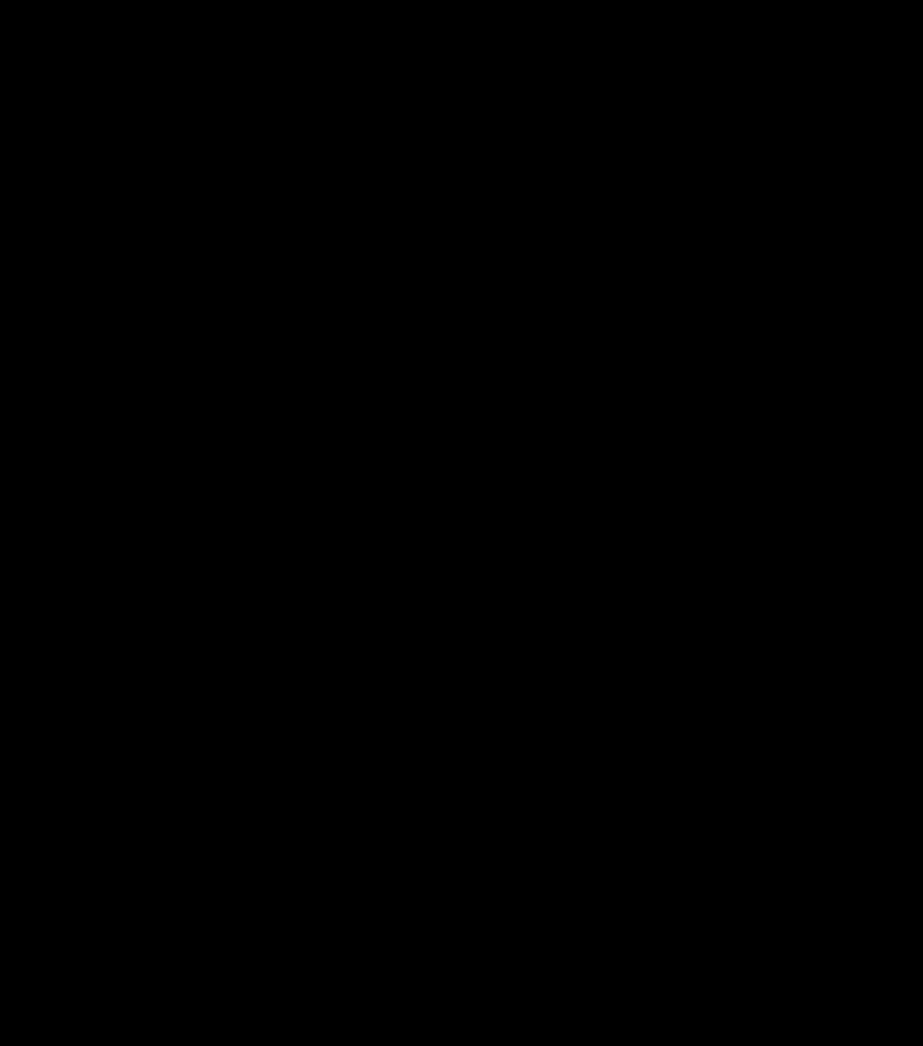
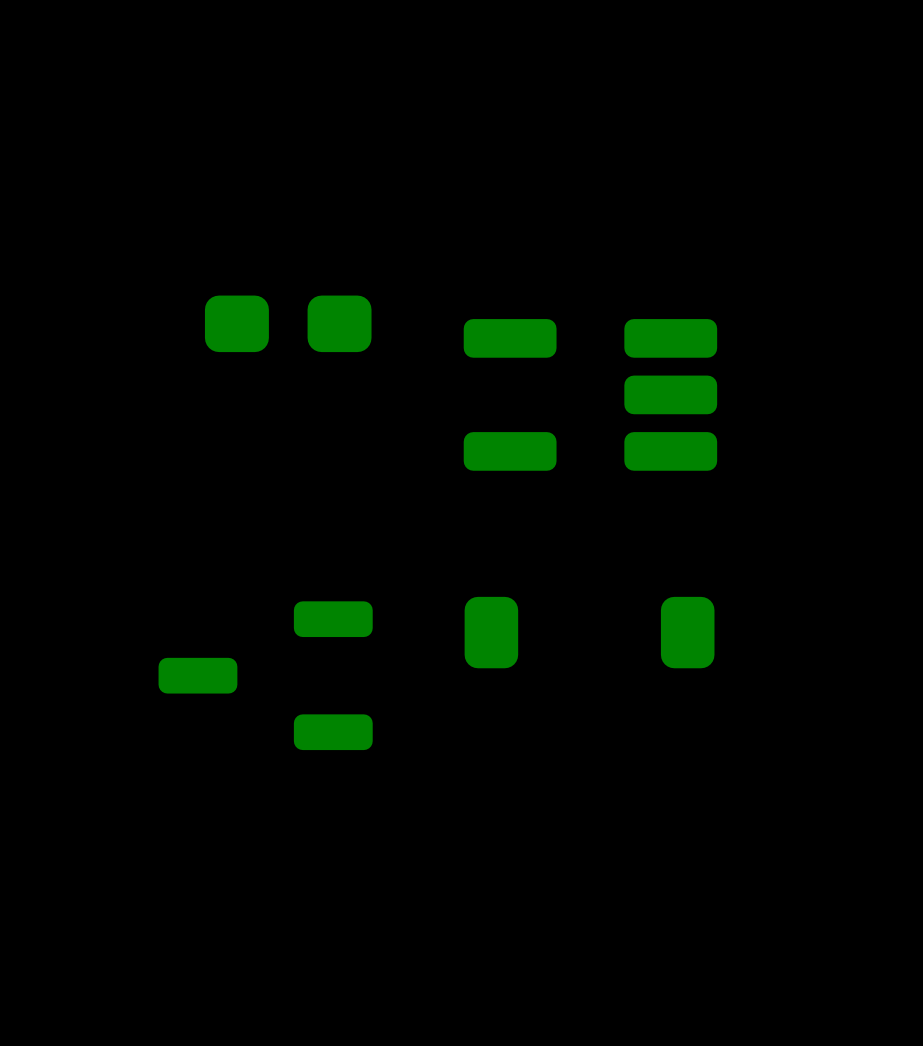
part: none -> (288, 323)
part: none -> (590, 394)
part: none -> (589, 632)
part: none -> (265, 675)

